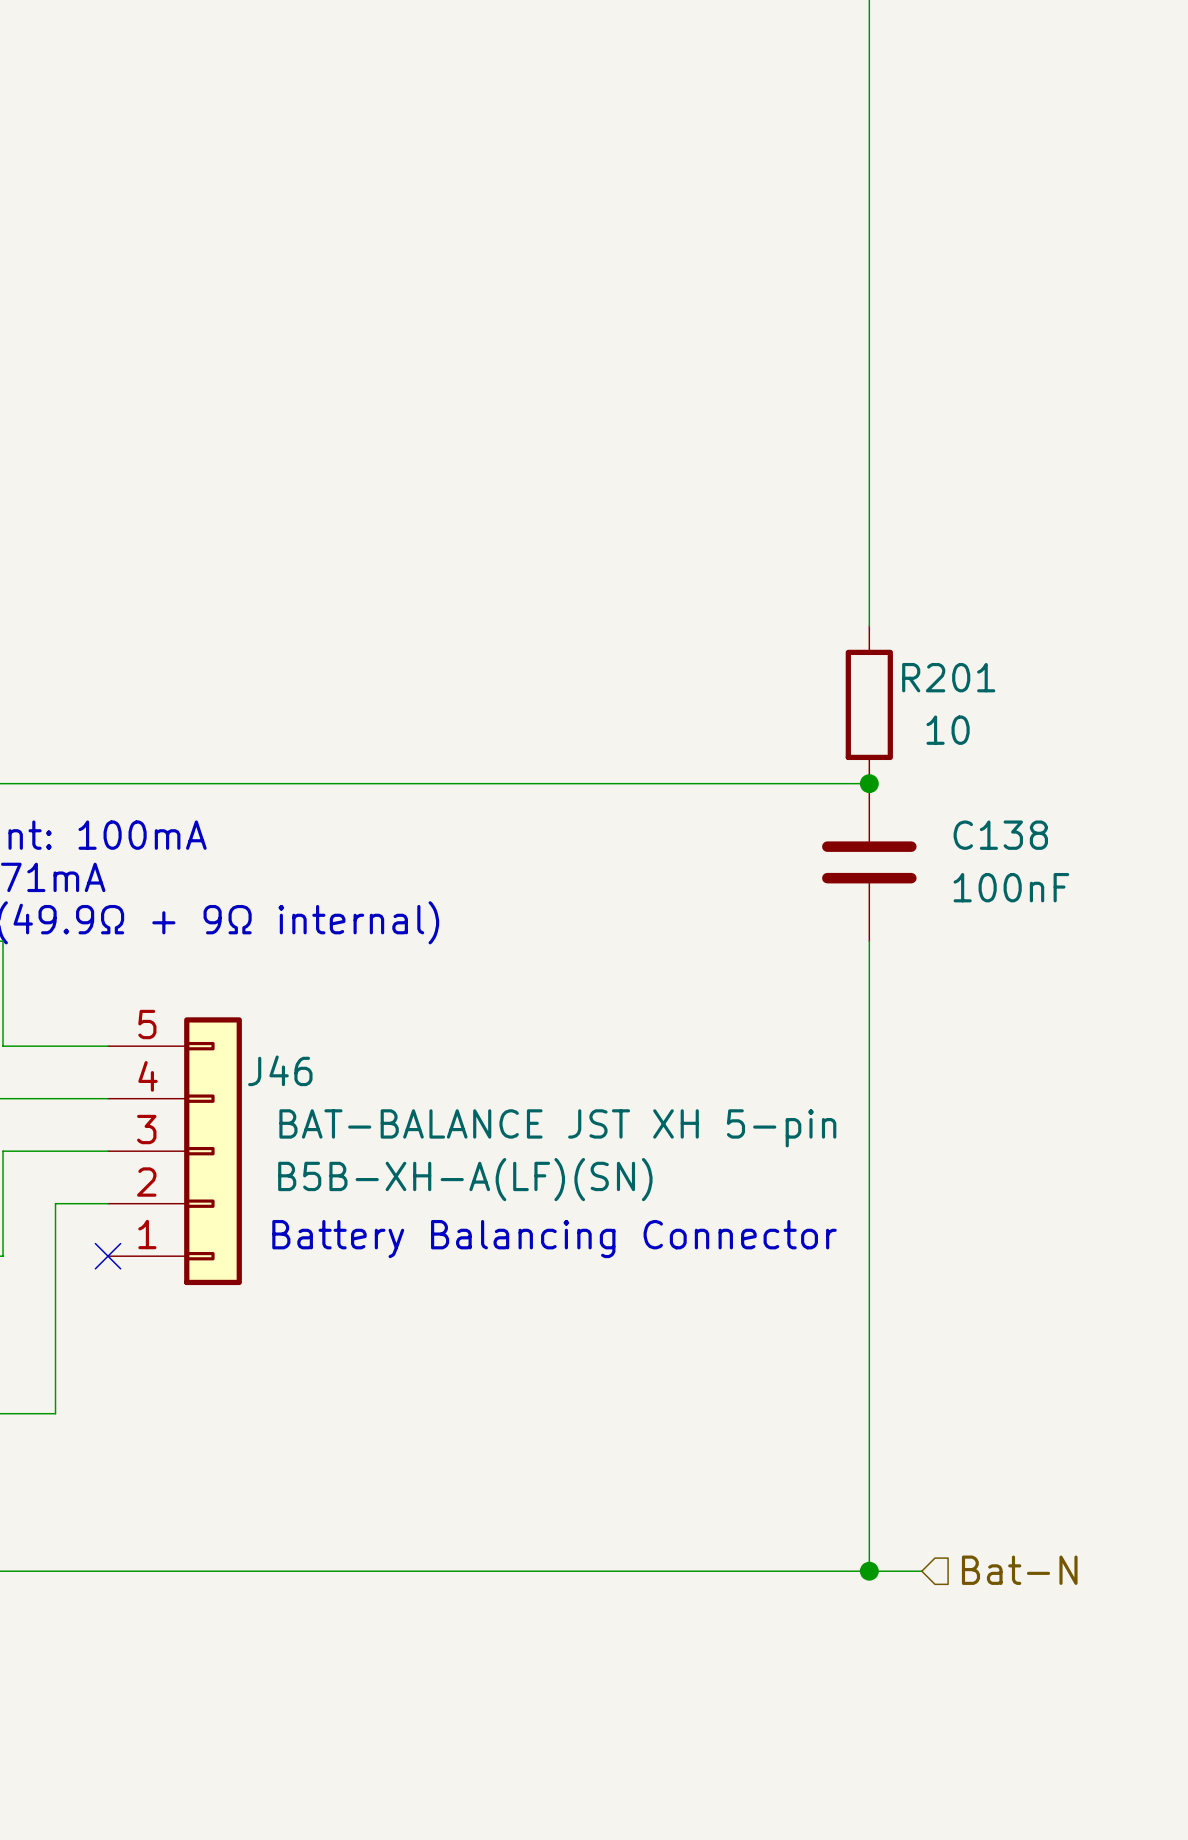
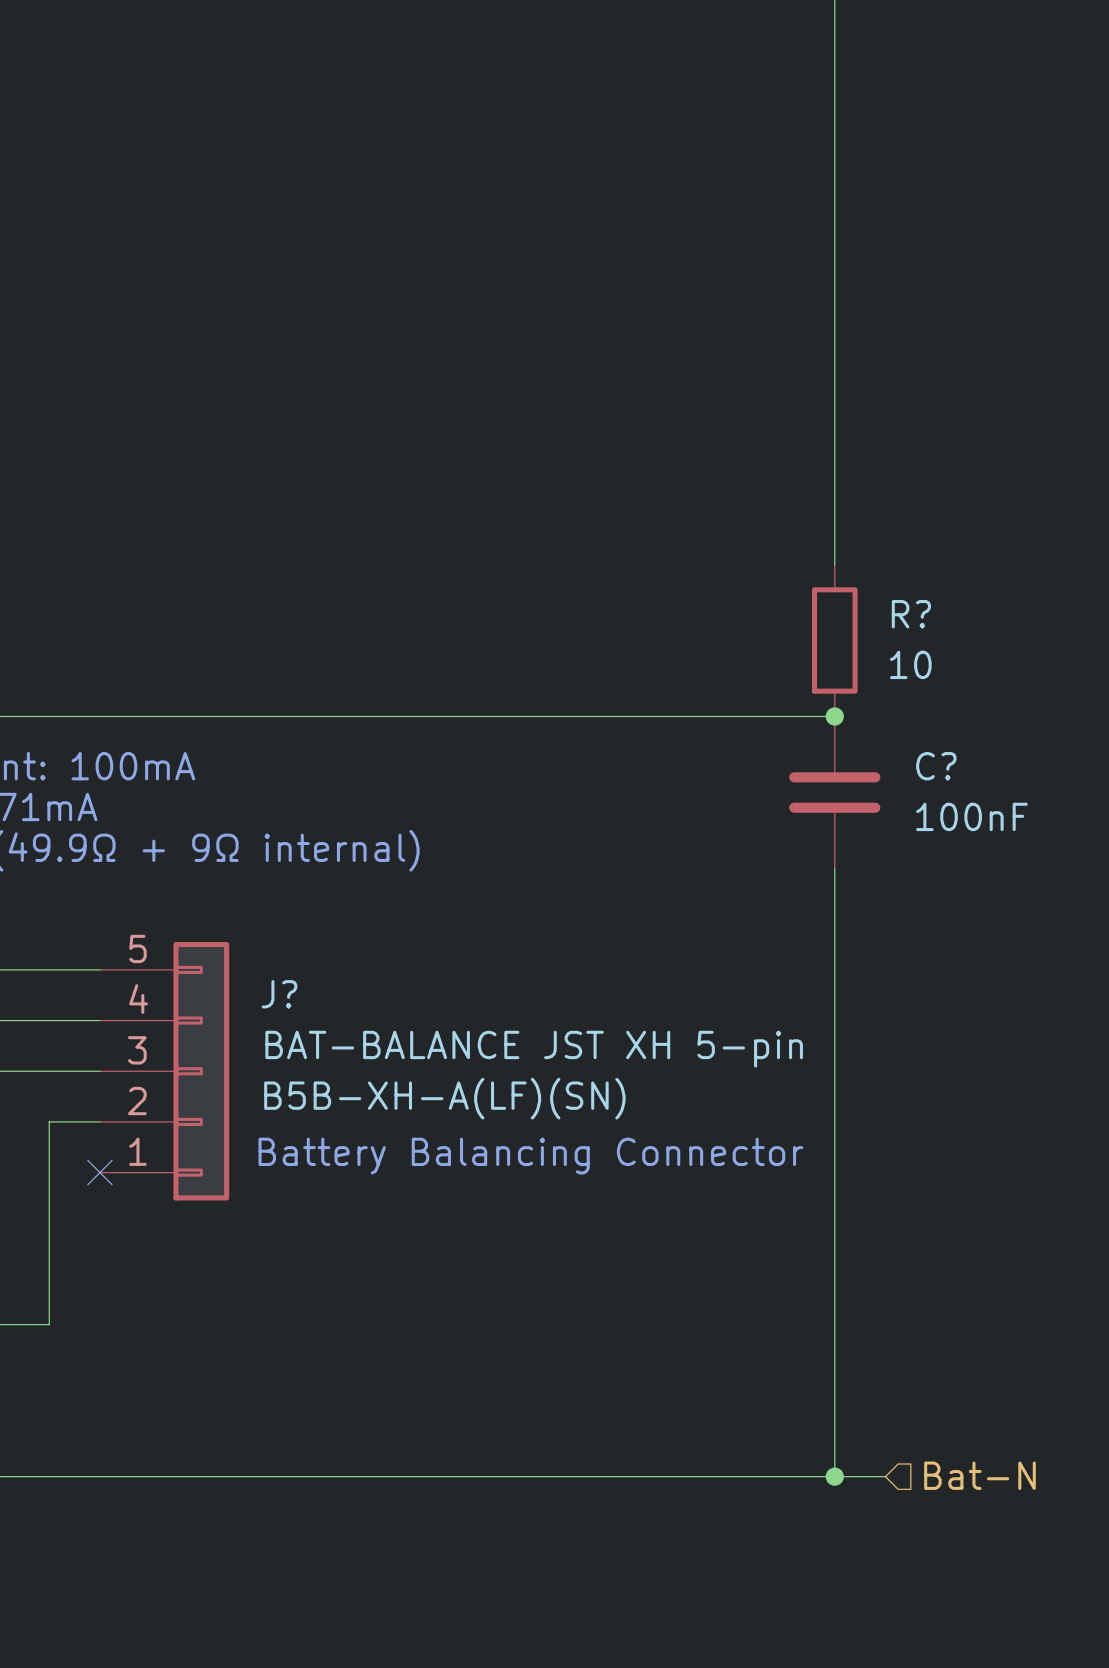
R201 name: R201 (948, 677) -> R? (911, 614)
C138 name: C138 (1000, 835) -> C? (936, 766)
J46 name: J46 (280, 1070) -> J? (279, 994)

